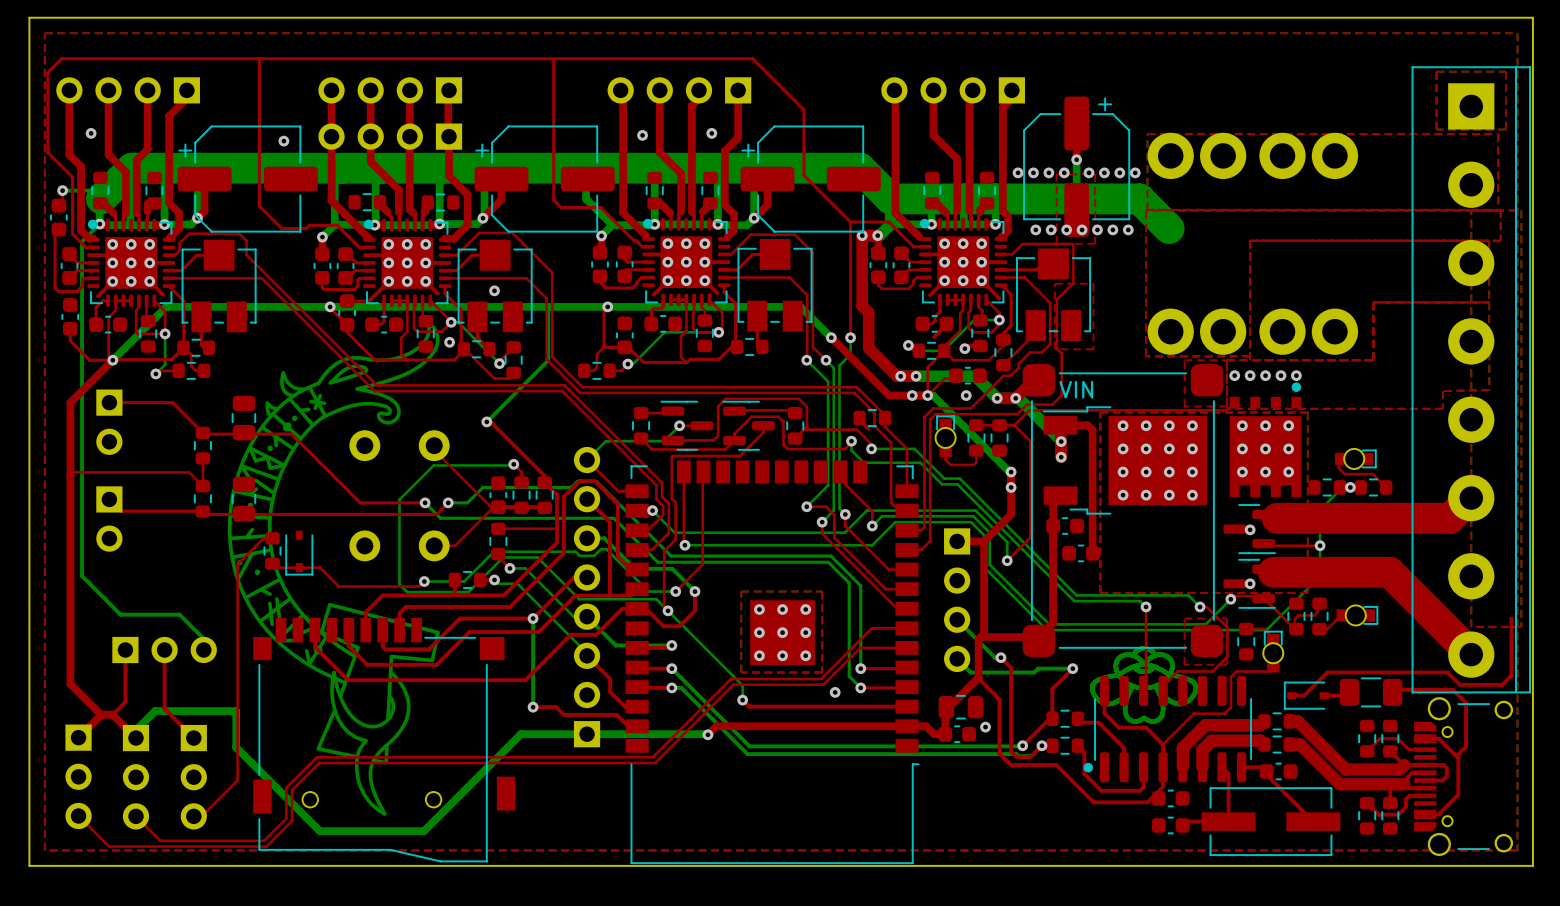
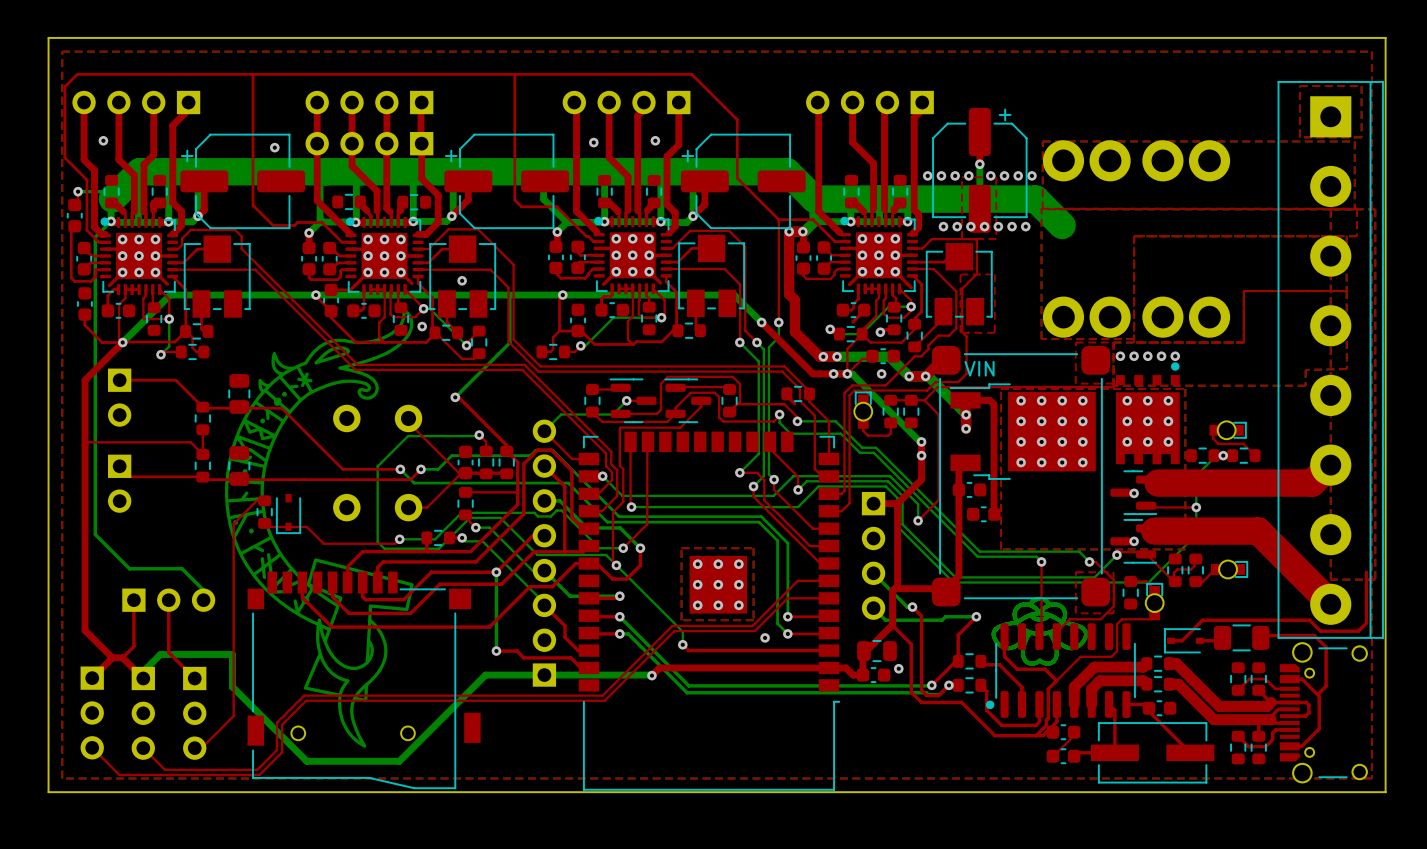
top track: (1193, 713) (1163, 744) (1163, 767) -> (1084, 656) (1080, 656) (1056, 680)
top track: (1146, 727) (1163, 744) (1163, 783) -> (1041, 669) (1045, 669) (1056, 680)
top track: none -> (1056, 680) (1048, 689) (1048, 718) (1046, 725) (1036, 735)
top track: none -> (1077, 732) (1056, 752)

